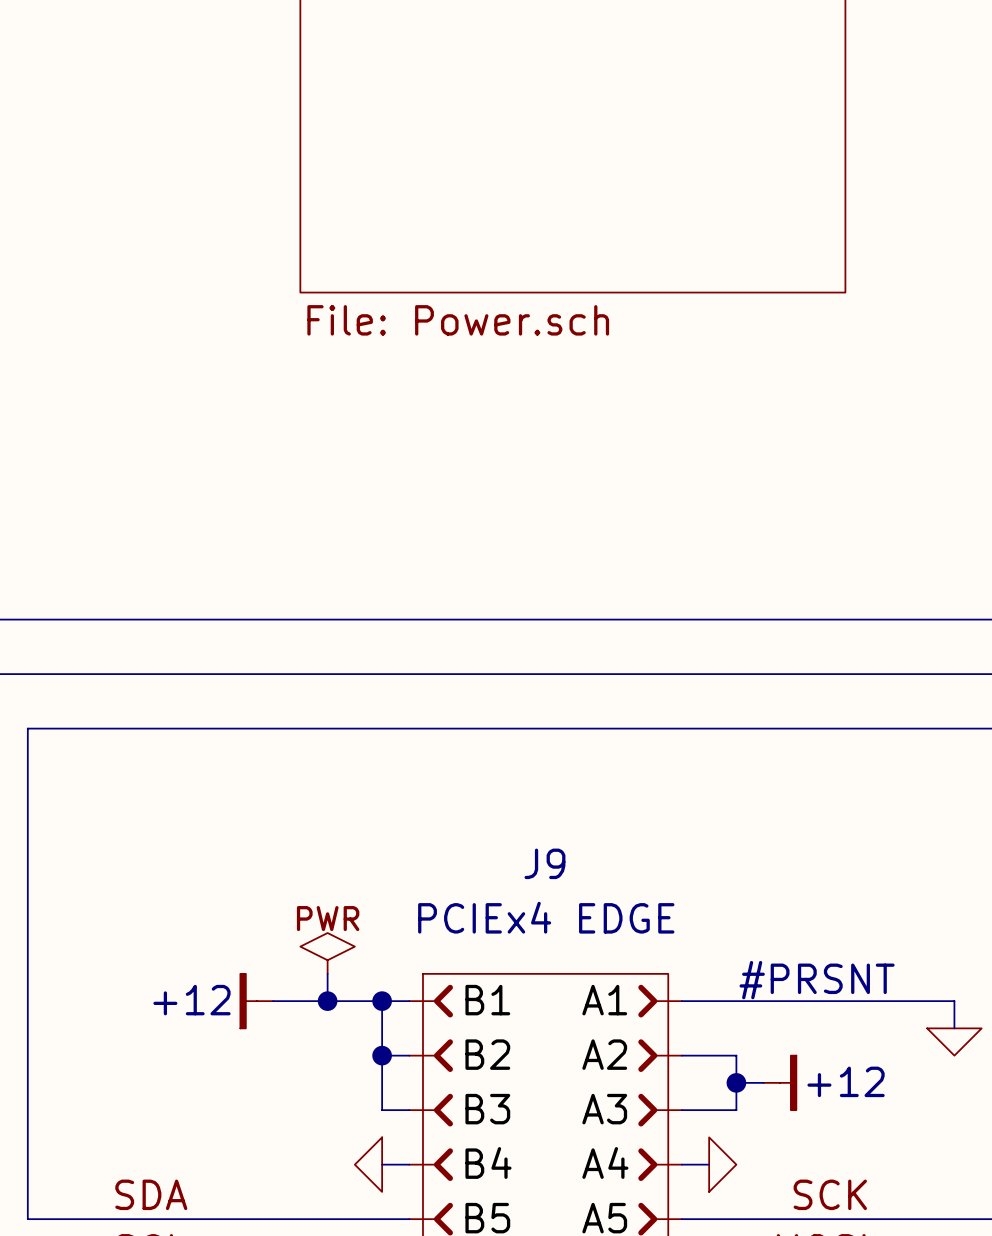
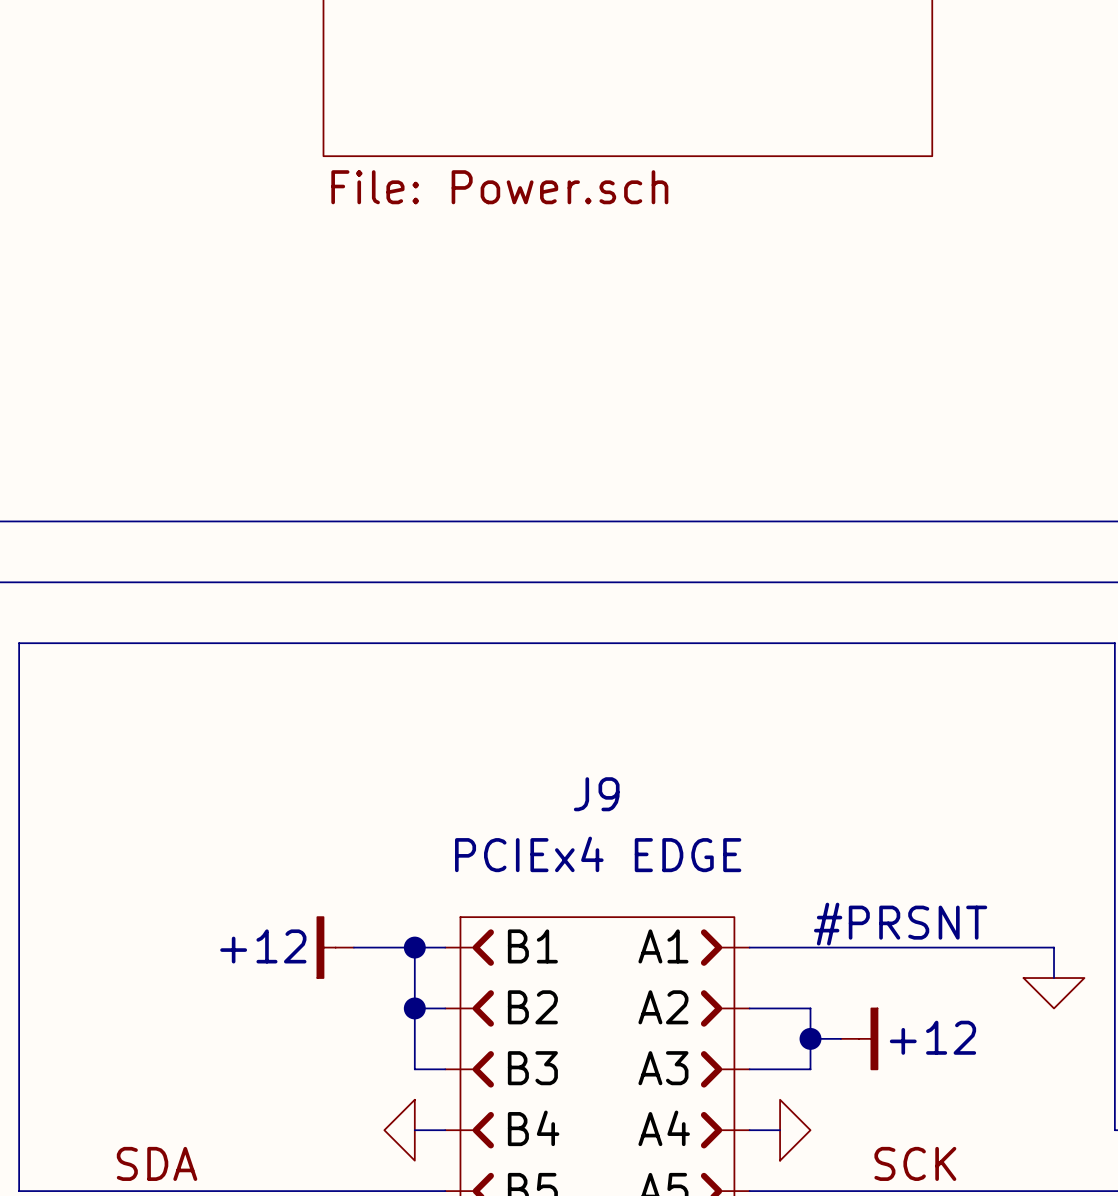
power symbol: (327, 953) -> none
wire: (327, 973) (327, 1001) (273, 1001) -> none
power symbol position: +12 (256, 1001) -> +12 (335, 947)
junction: (327, 1001) -> none

